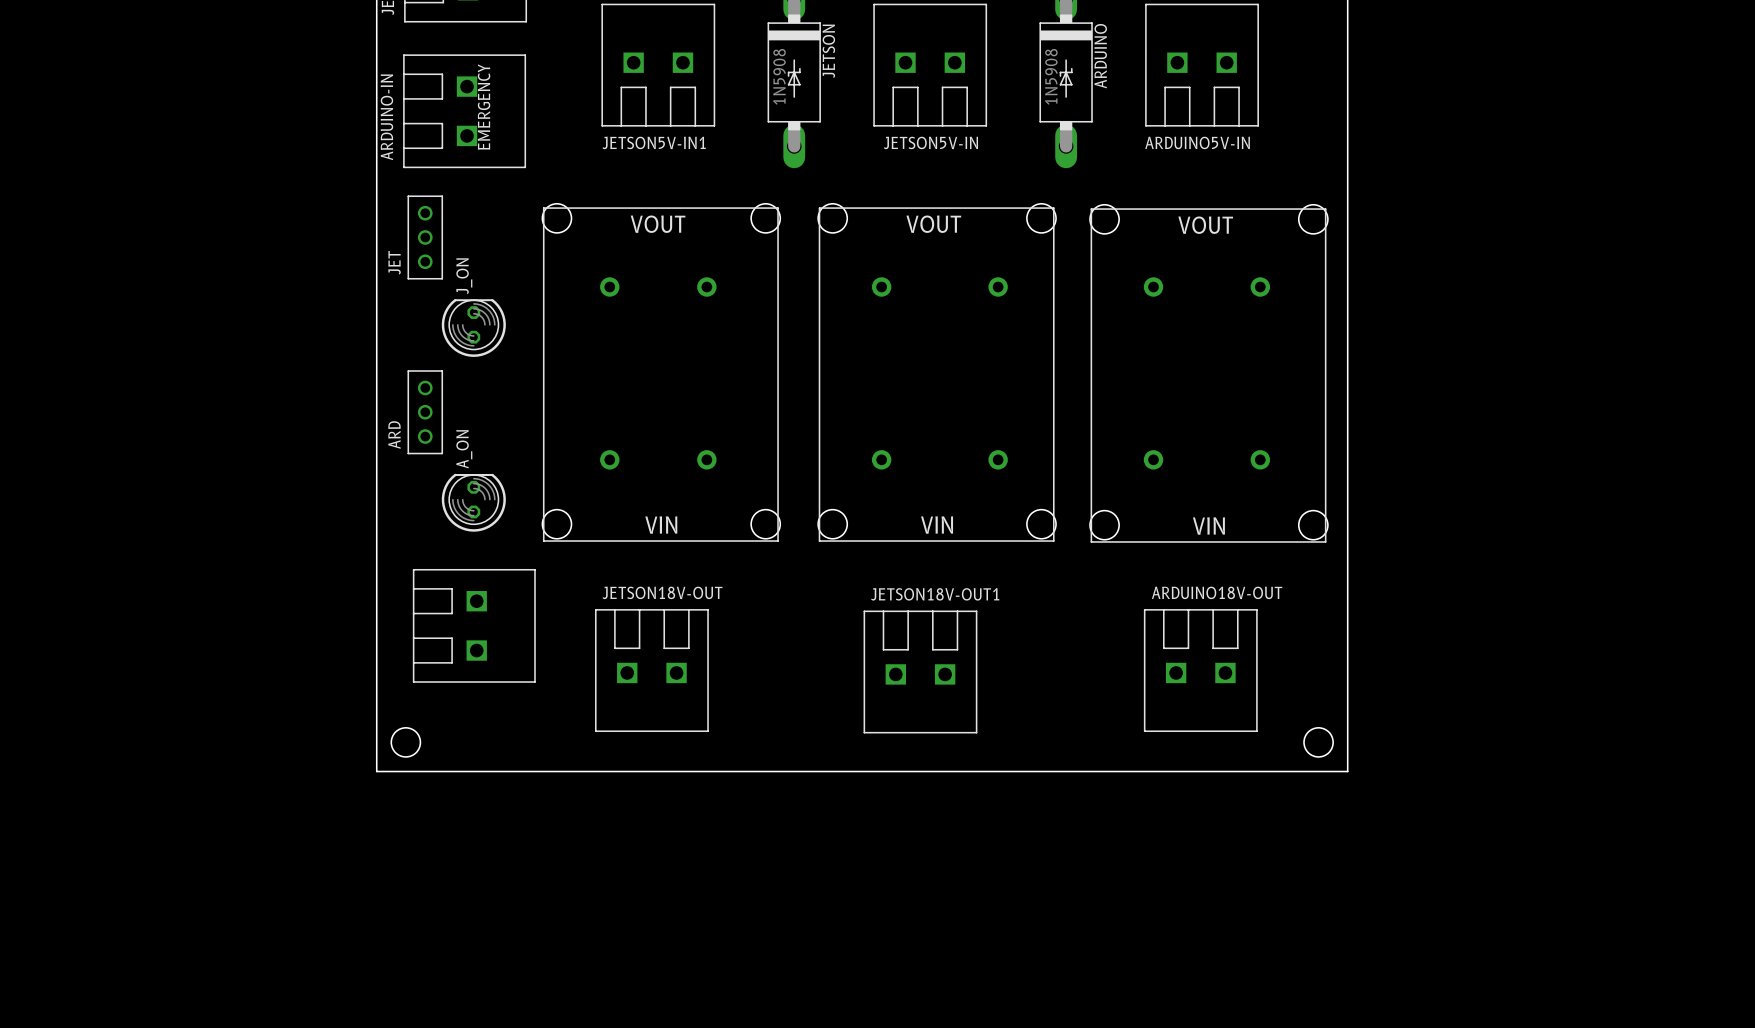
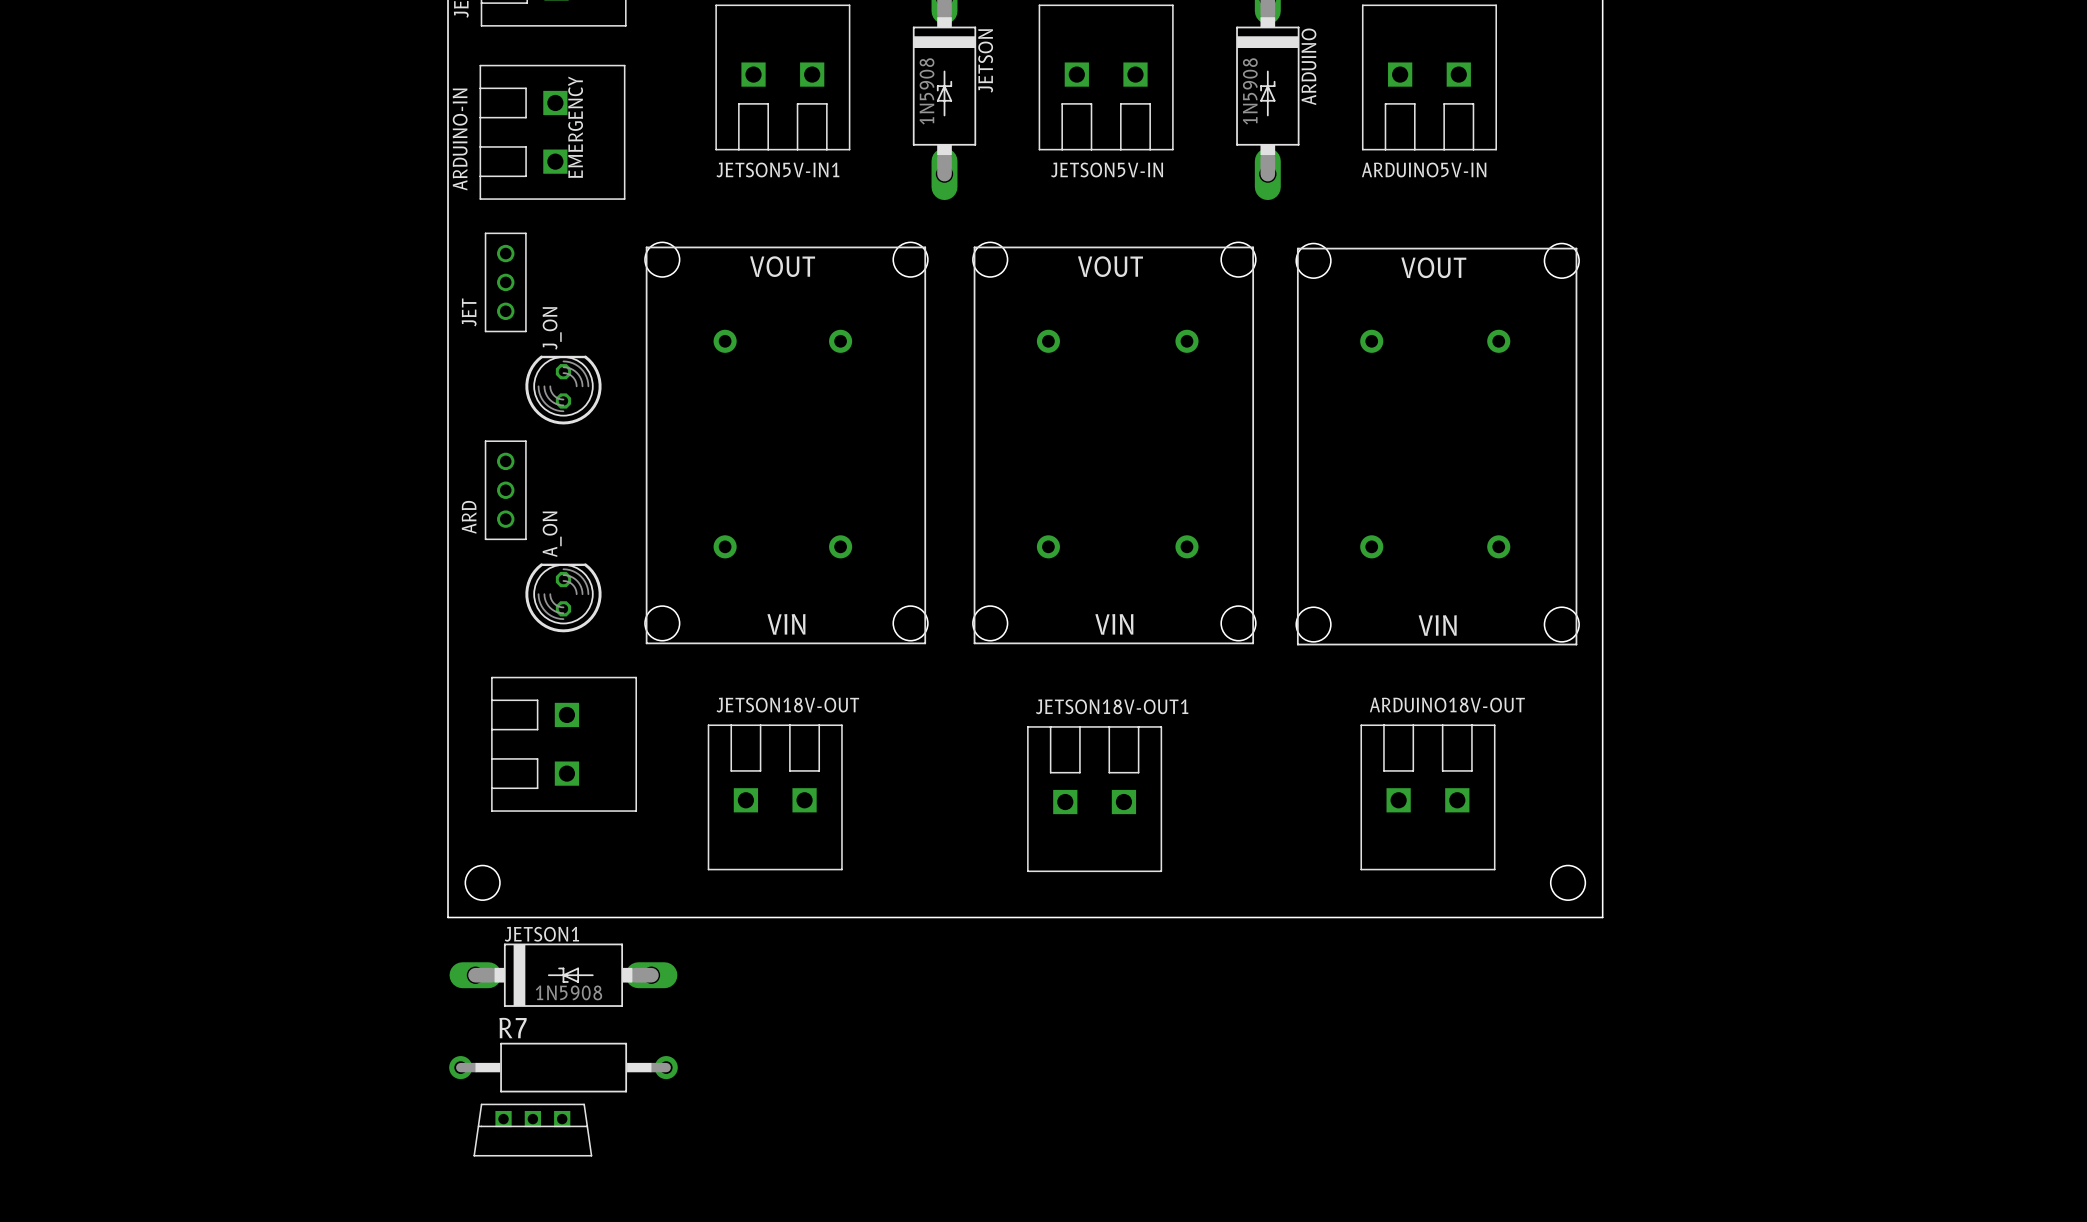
JETSON1: none -> 1N5908 (563, 975)
R7: none -> (563, 1067)
part: none -> (532, 1130)

